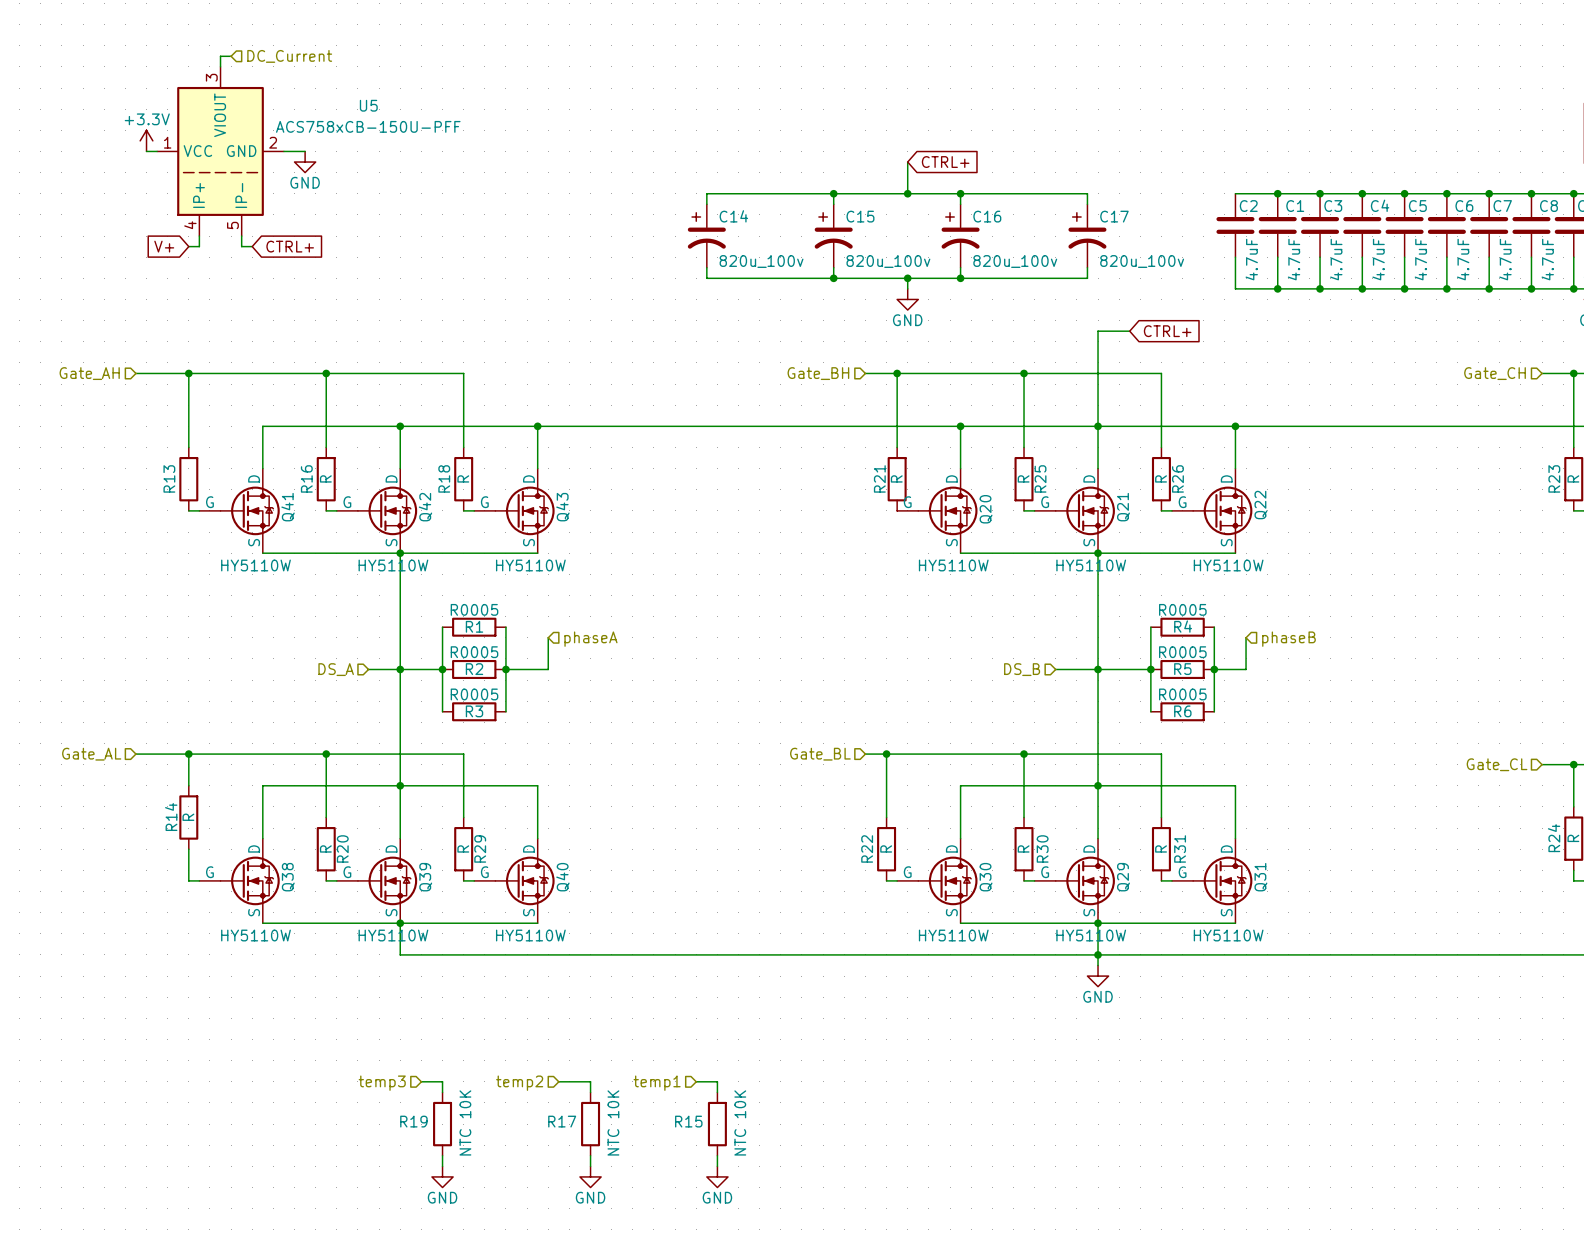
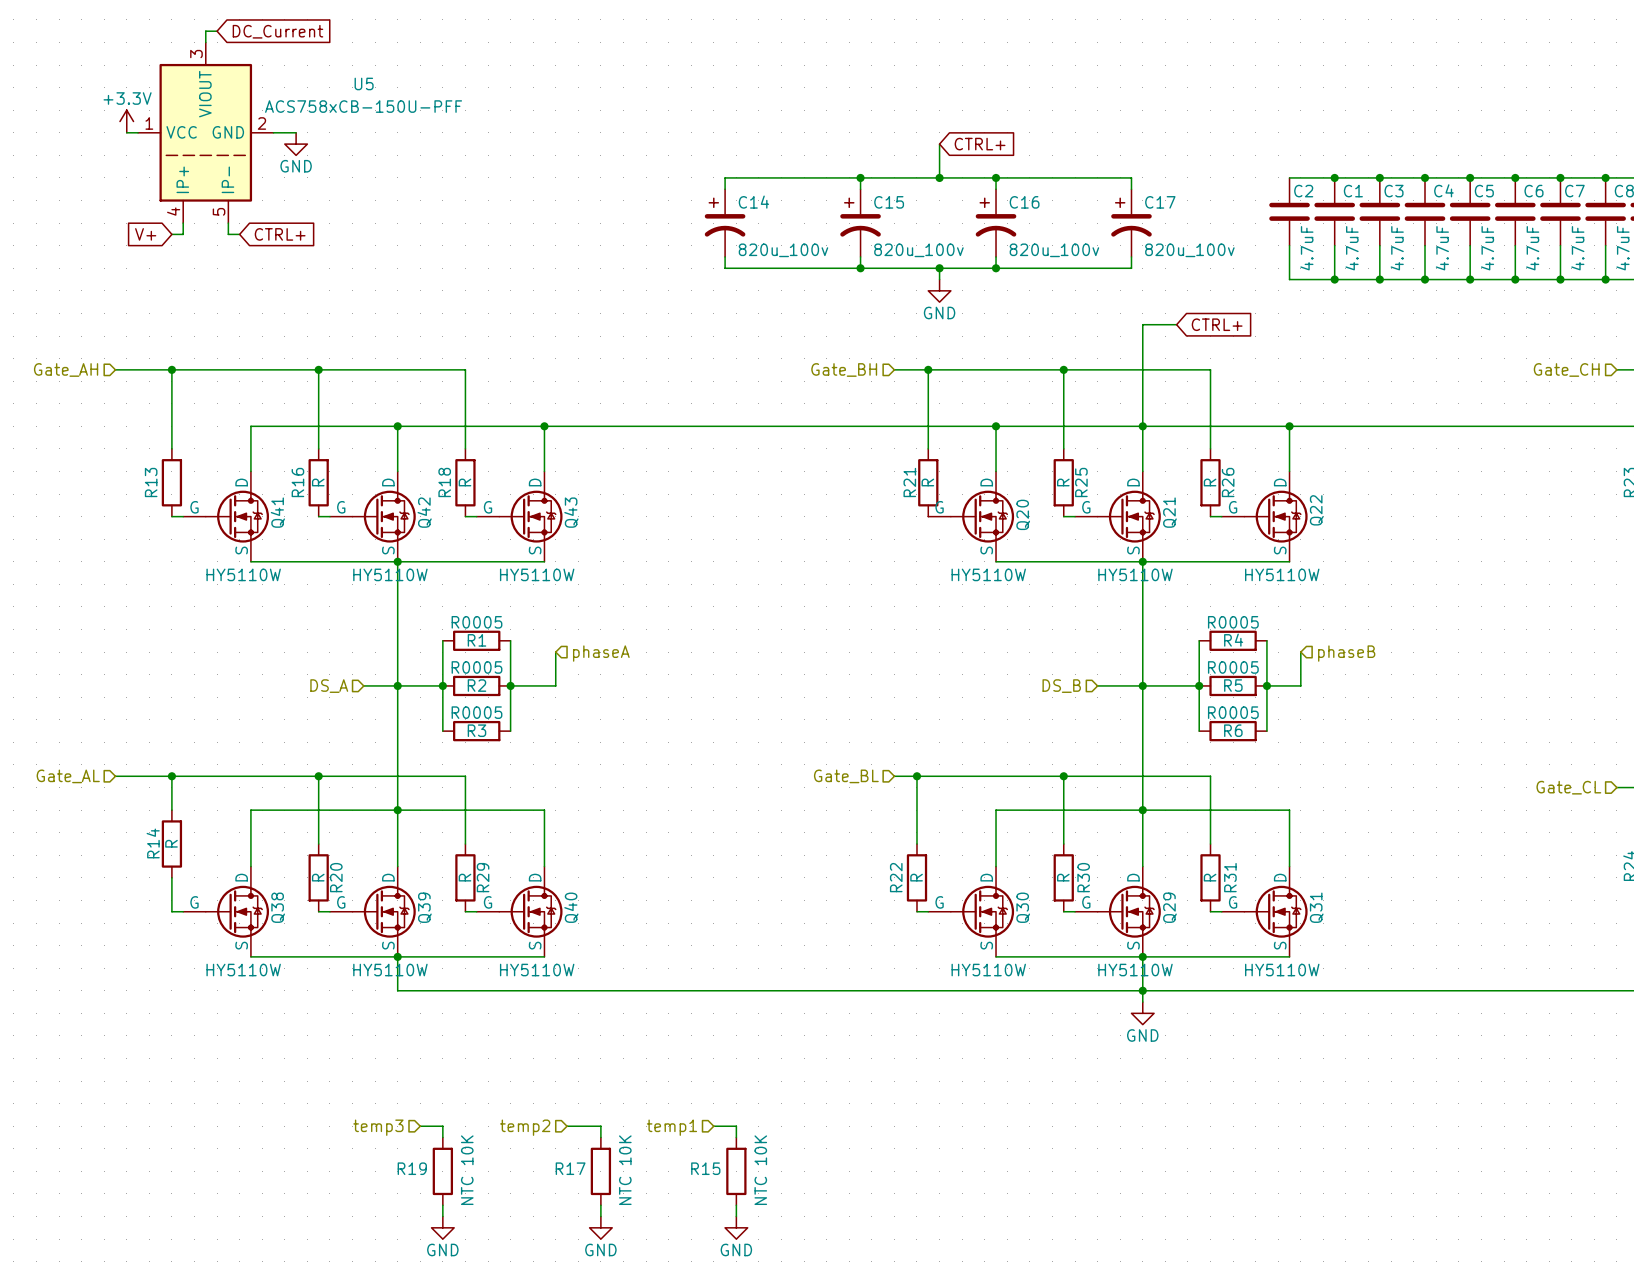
global label: none -> DC_Current (277, 31)
hierarchical label: DC_Current (289, 56) -> none

